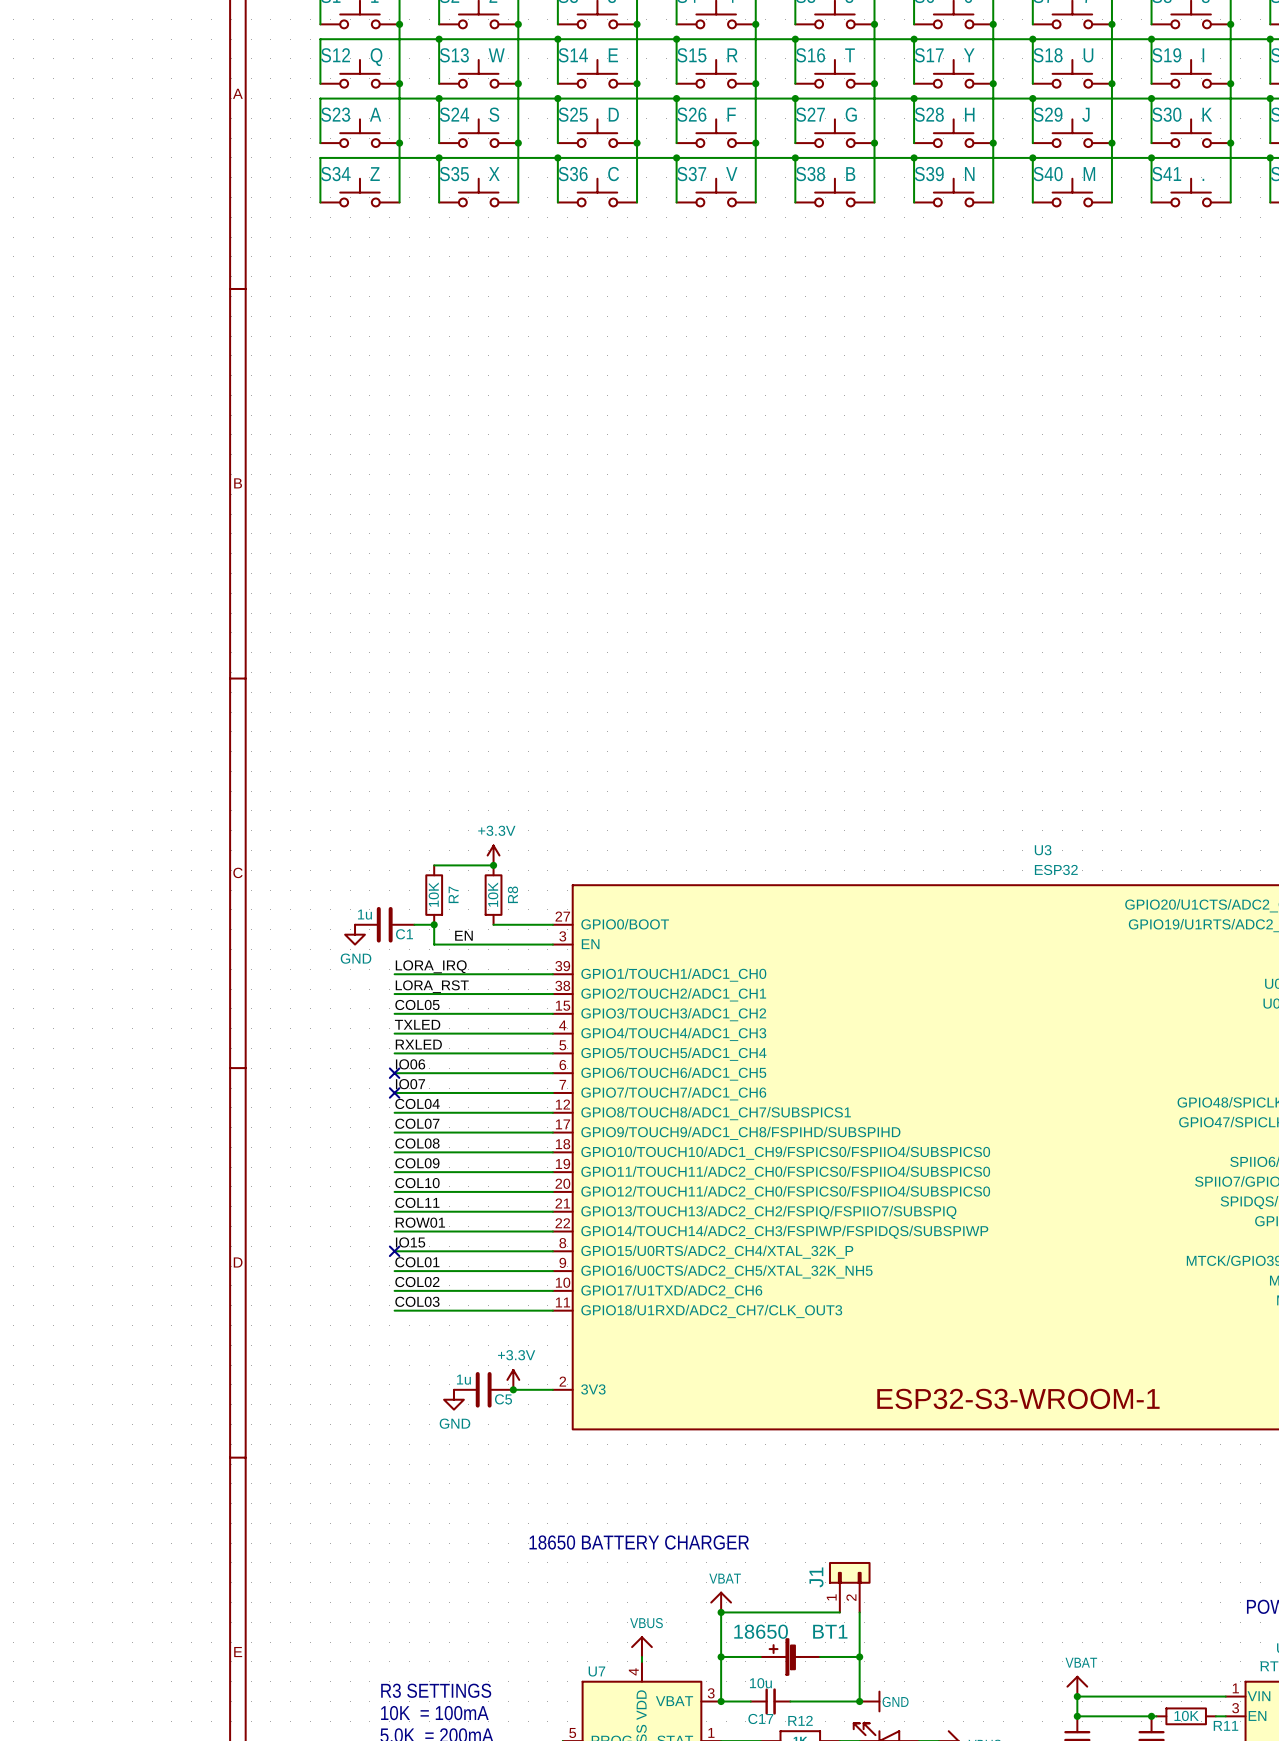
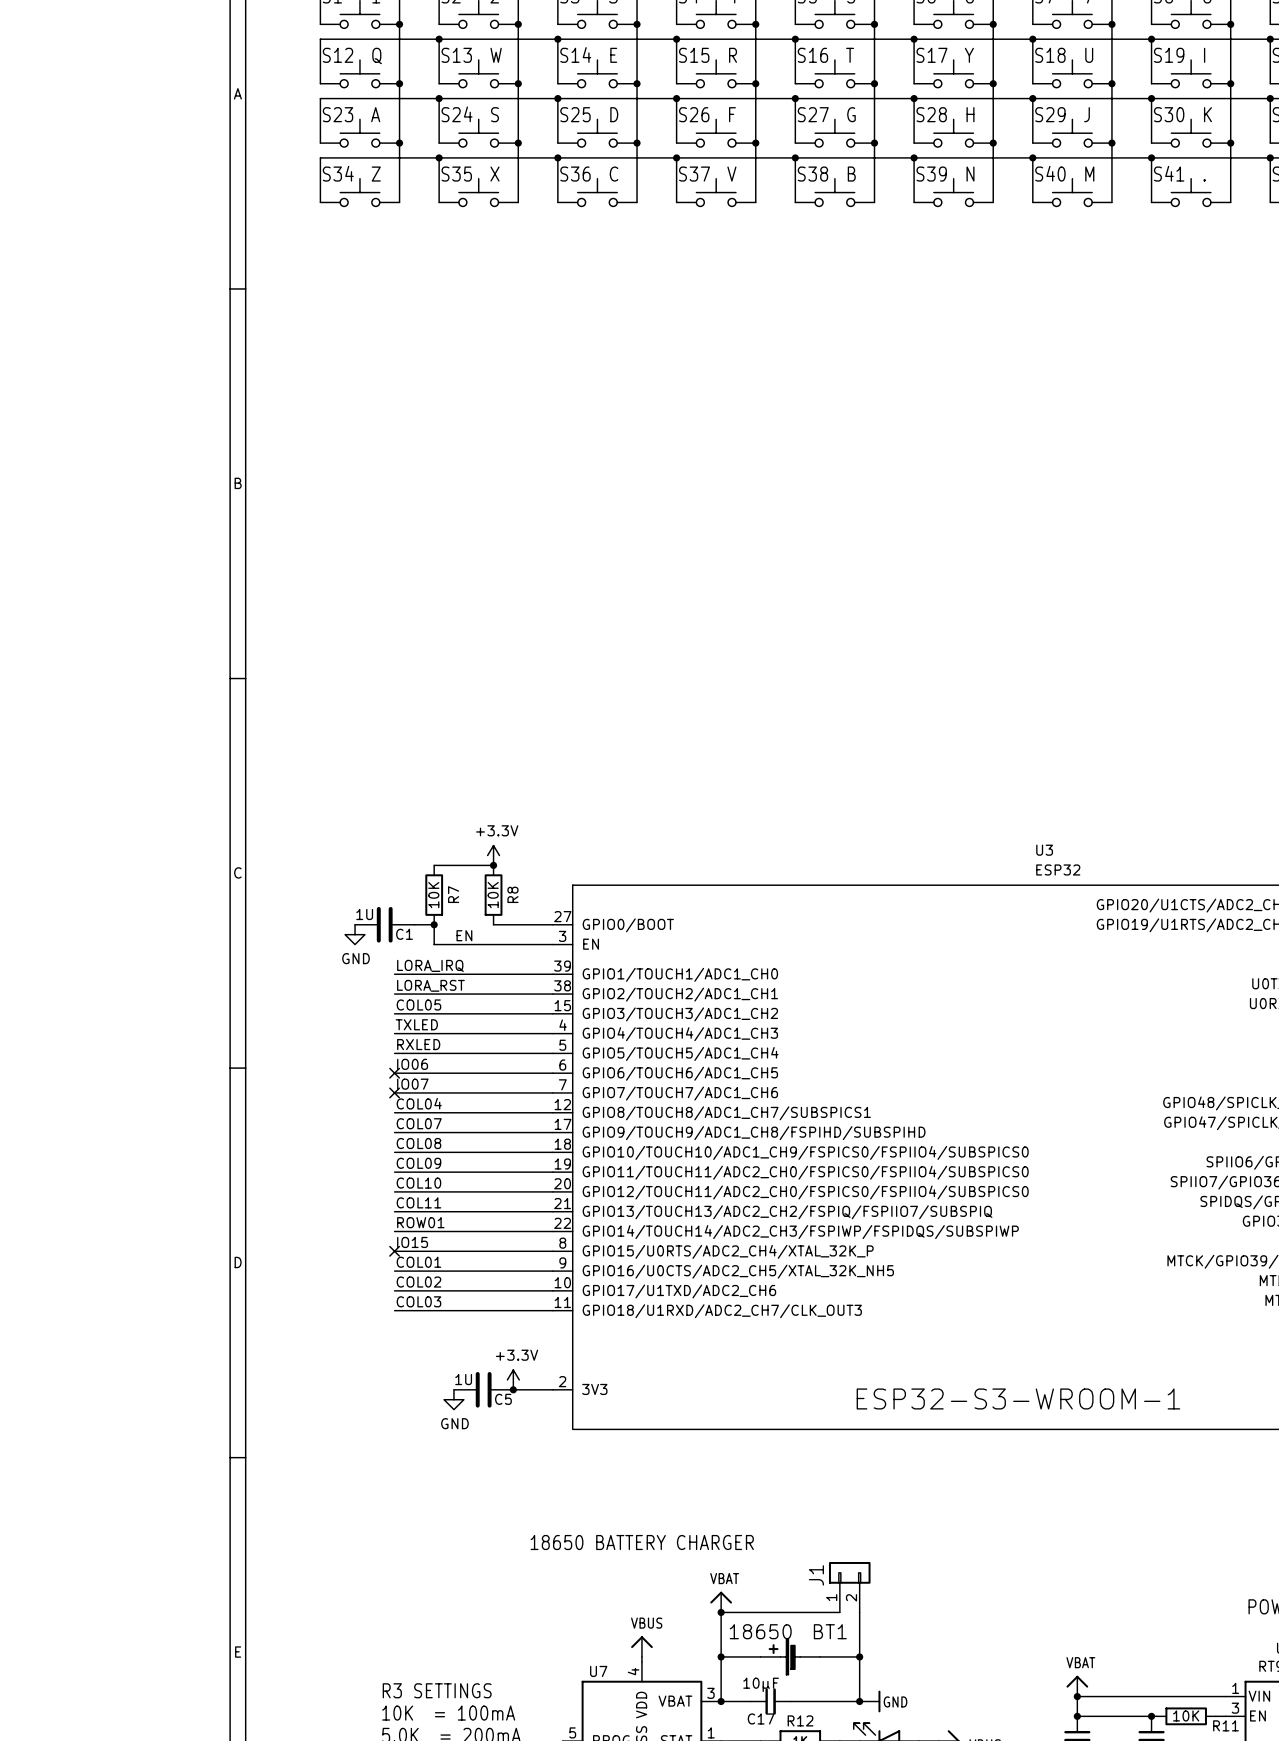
C1 value: 1u (364, 914) -> 1U (364, 914)
C5 value: 1u (463, 1379) -> 1U (463, 1379)
C17 value: 10u (760, 1683) -> 10µF (761, 1684)

